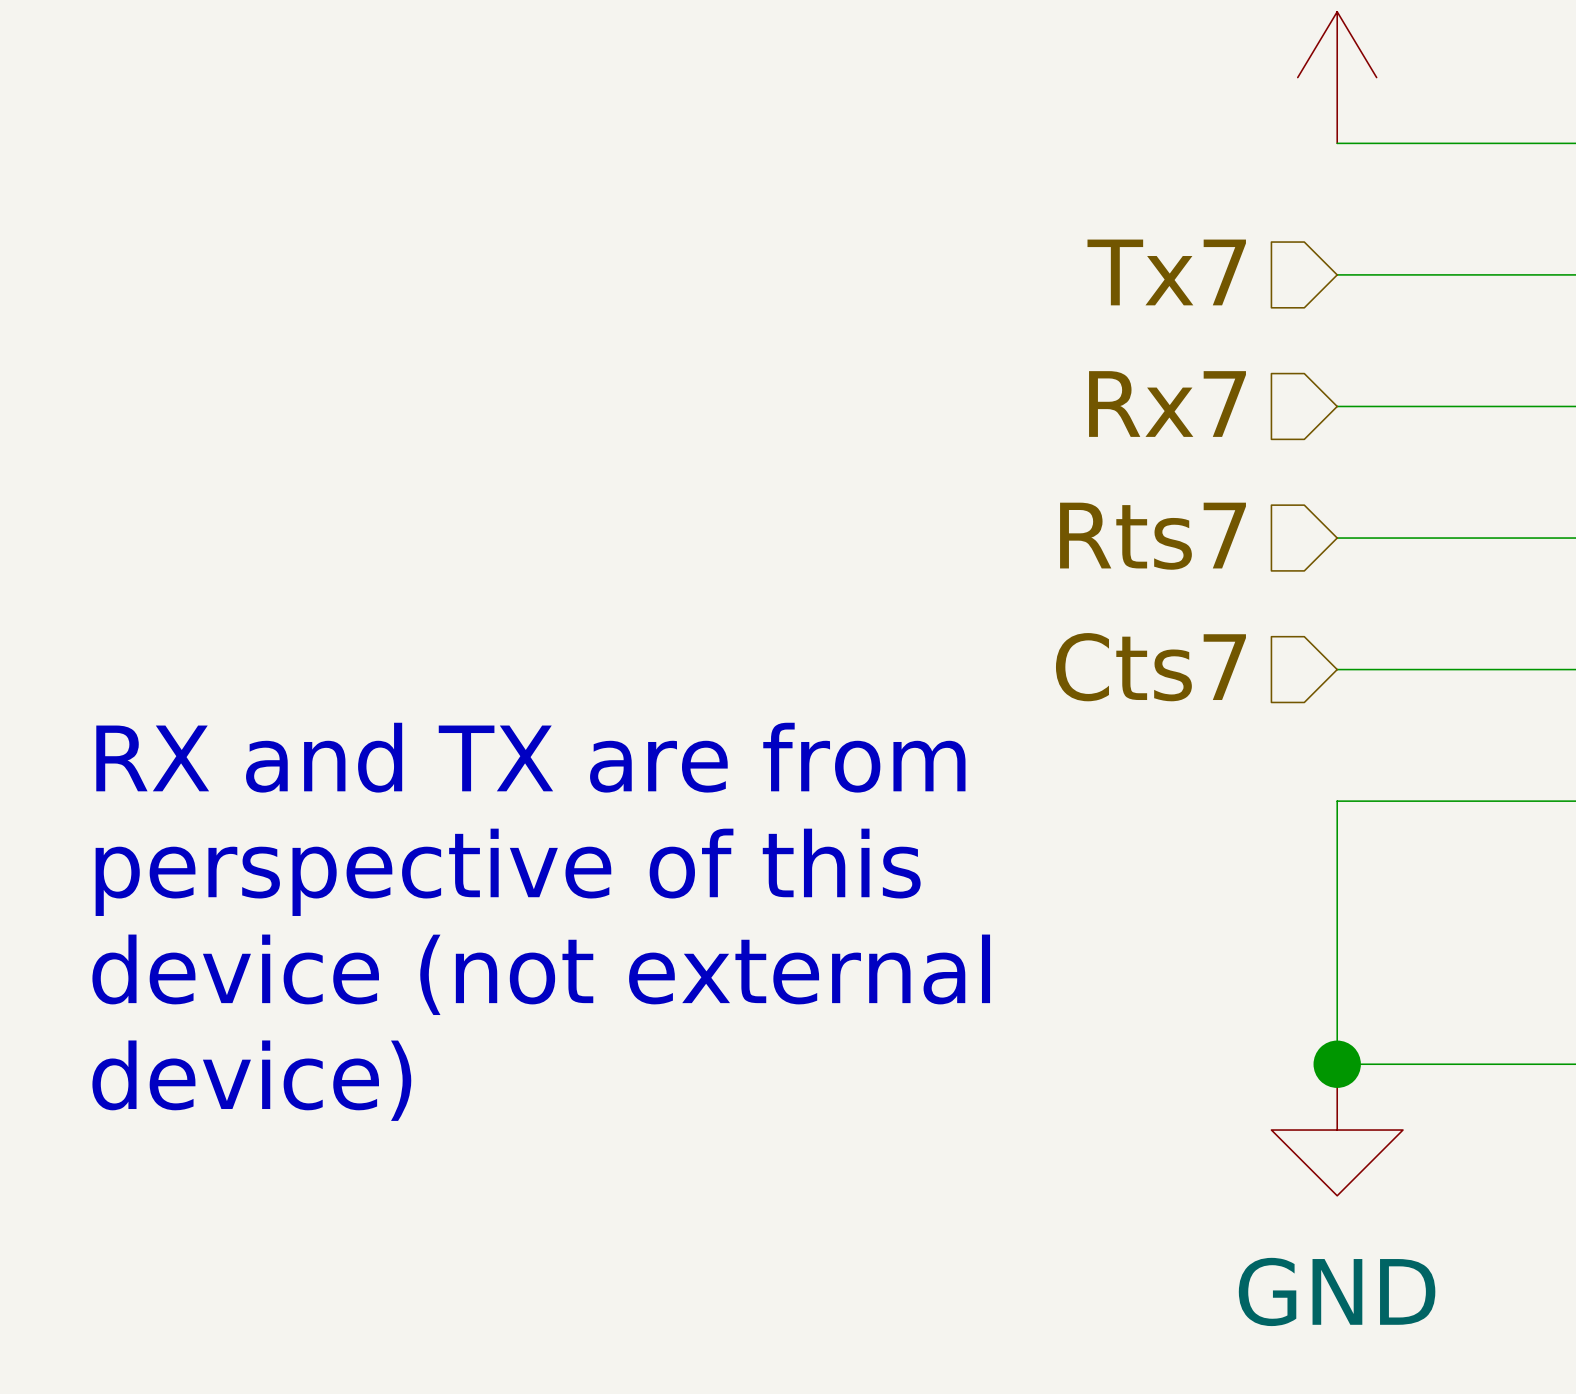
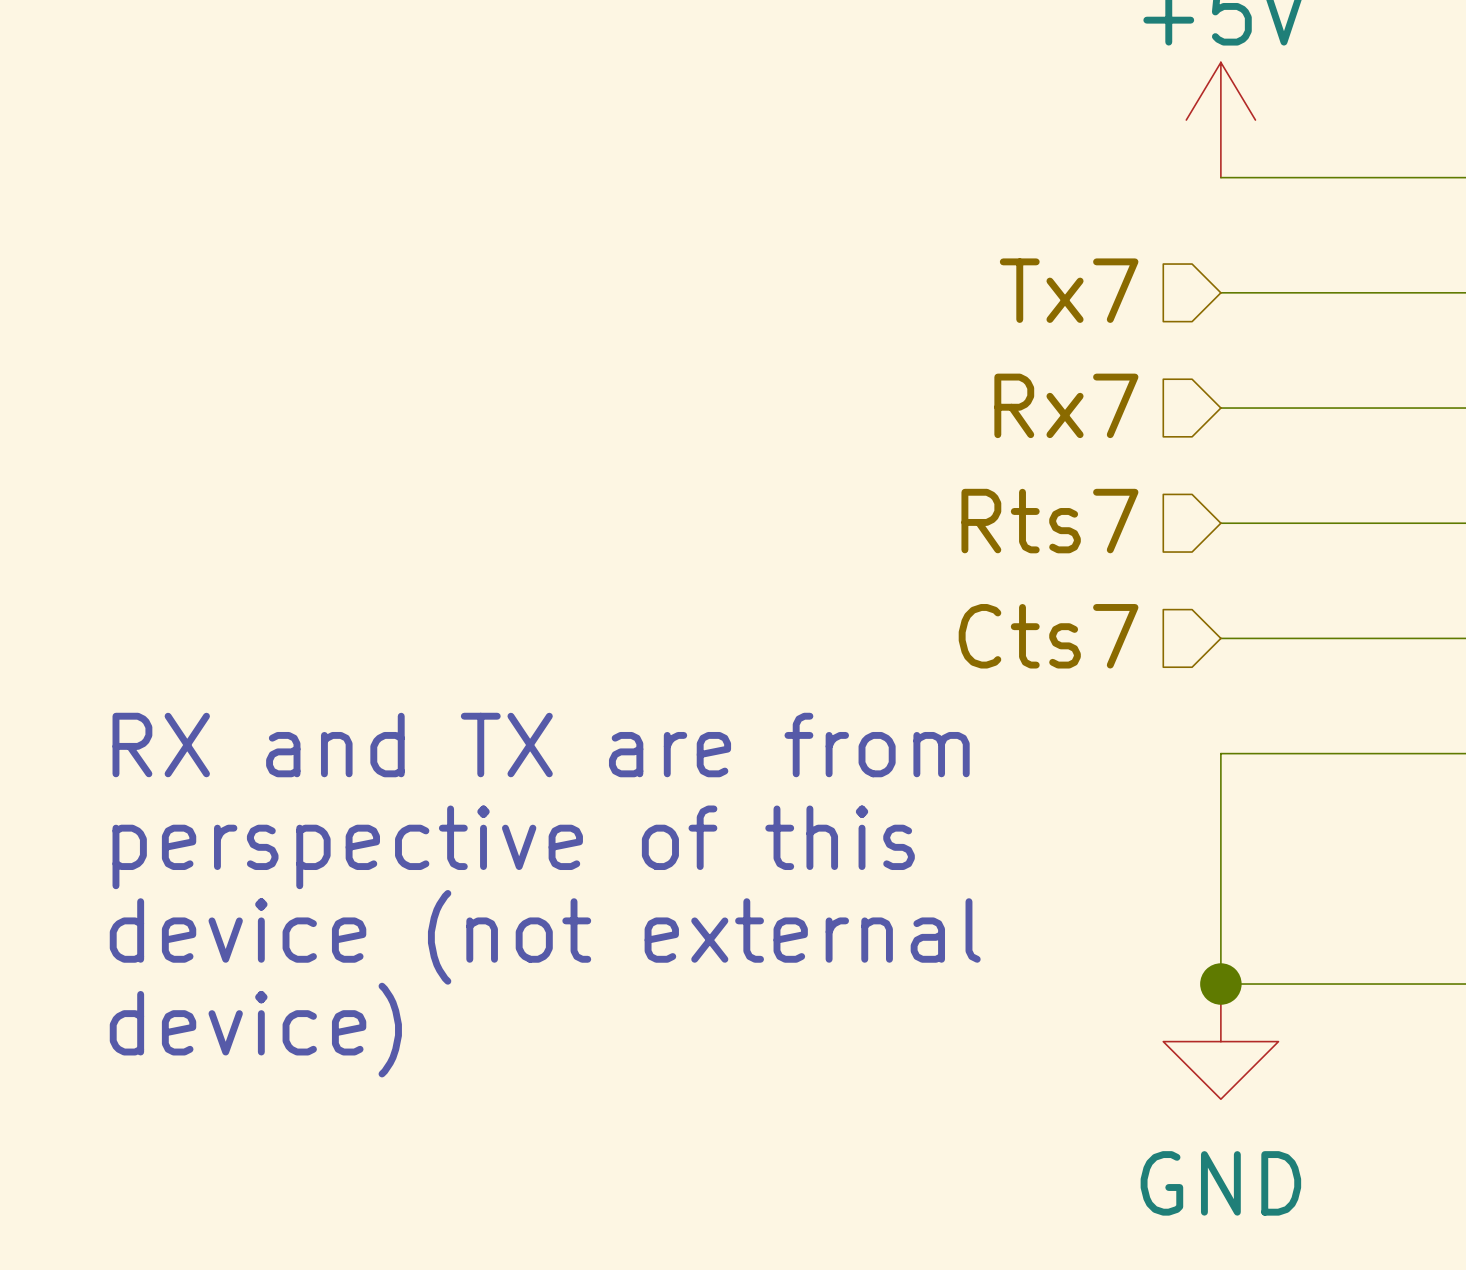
text position: RX and TX are from (530, 757) -> RX and TX are from (541, 745)
text position: perspective of this (508, 872) -> perspective of this (513, 847)
text position: device (not external (541, 974) -> device (not external (545, 937)
text position: device) (251, 1080) -> device) (255, 1030)

